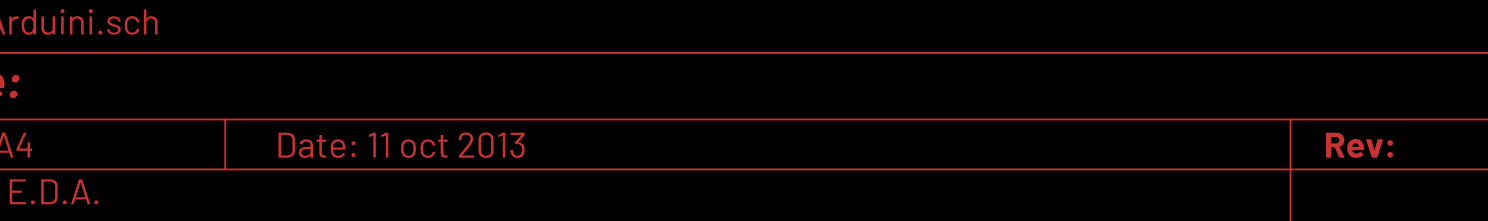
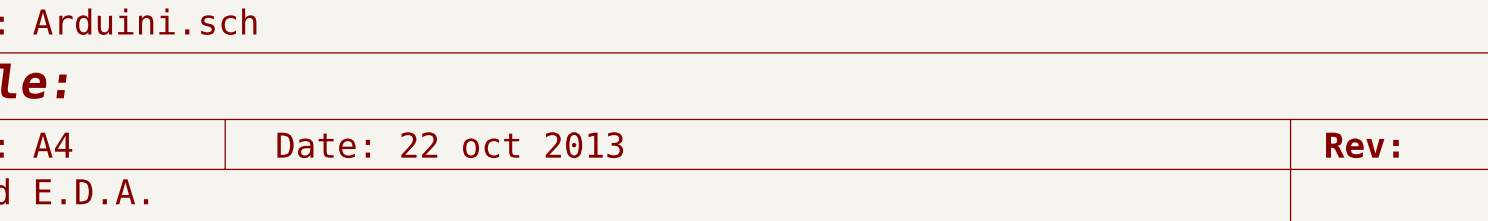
title block: Date: 11 oct 2013 (401, 145) -> Date: 22 oct 2013 (450, 145)

